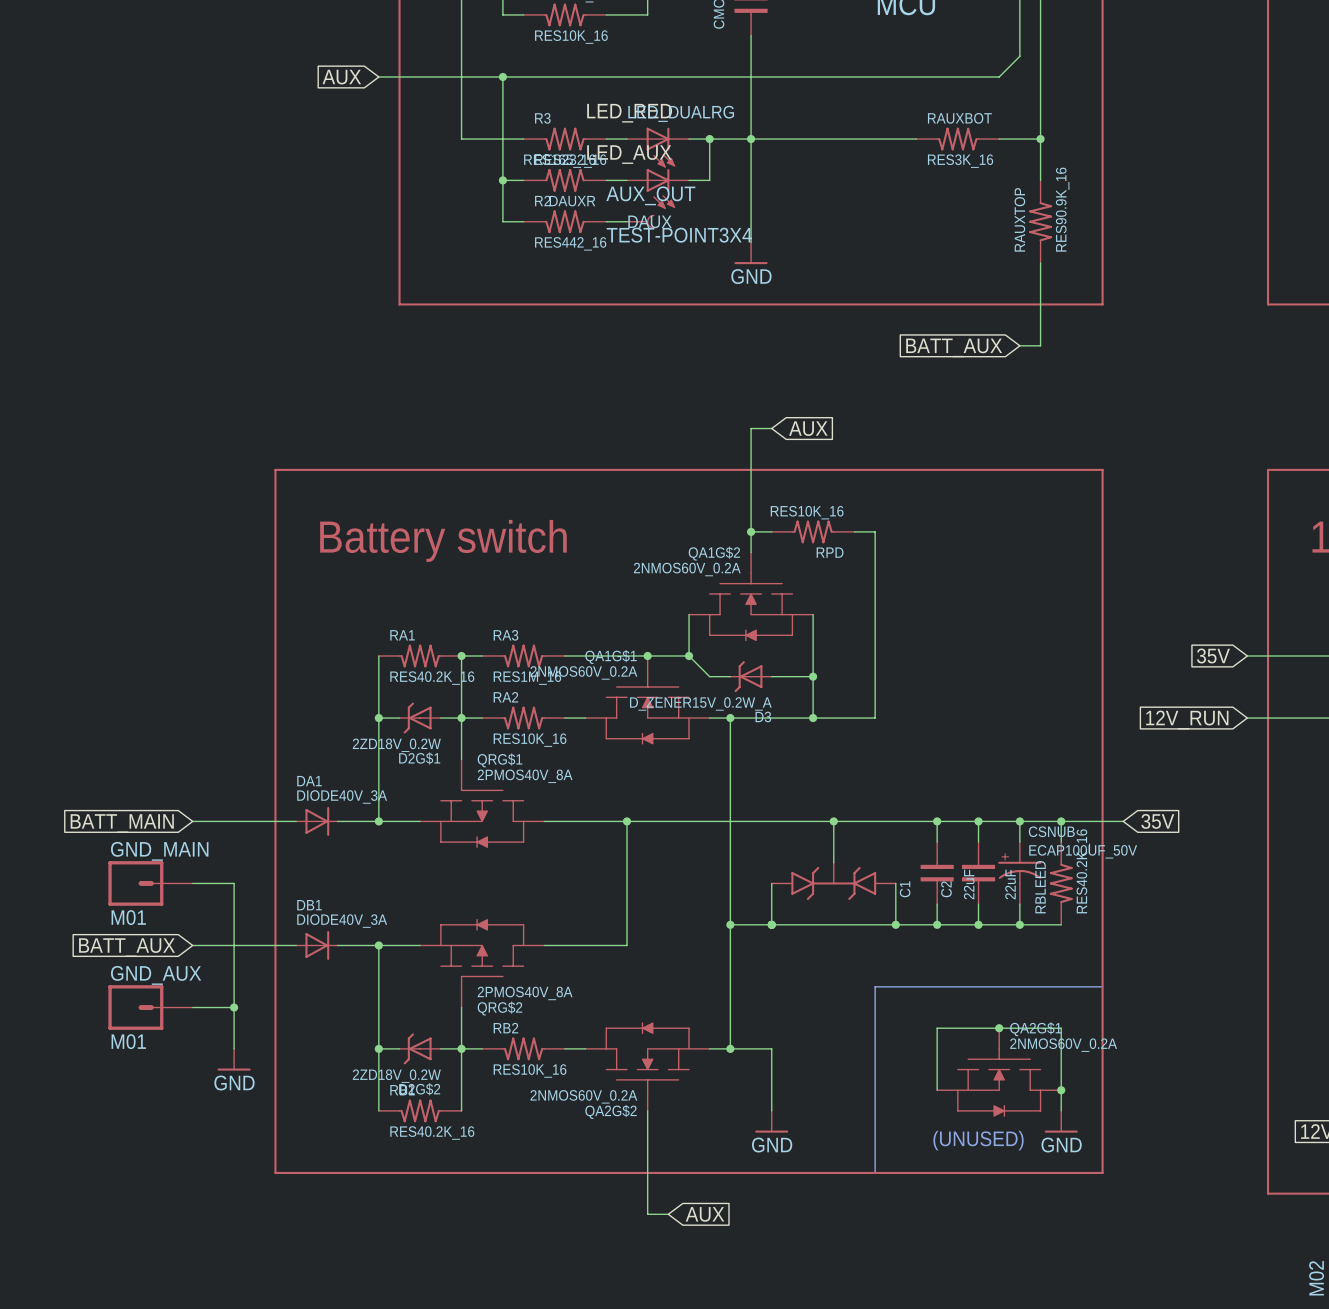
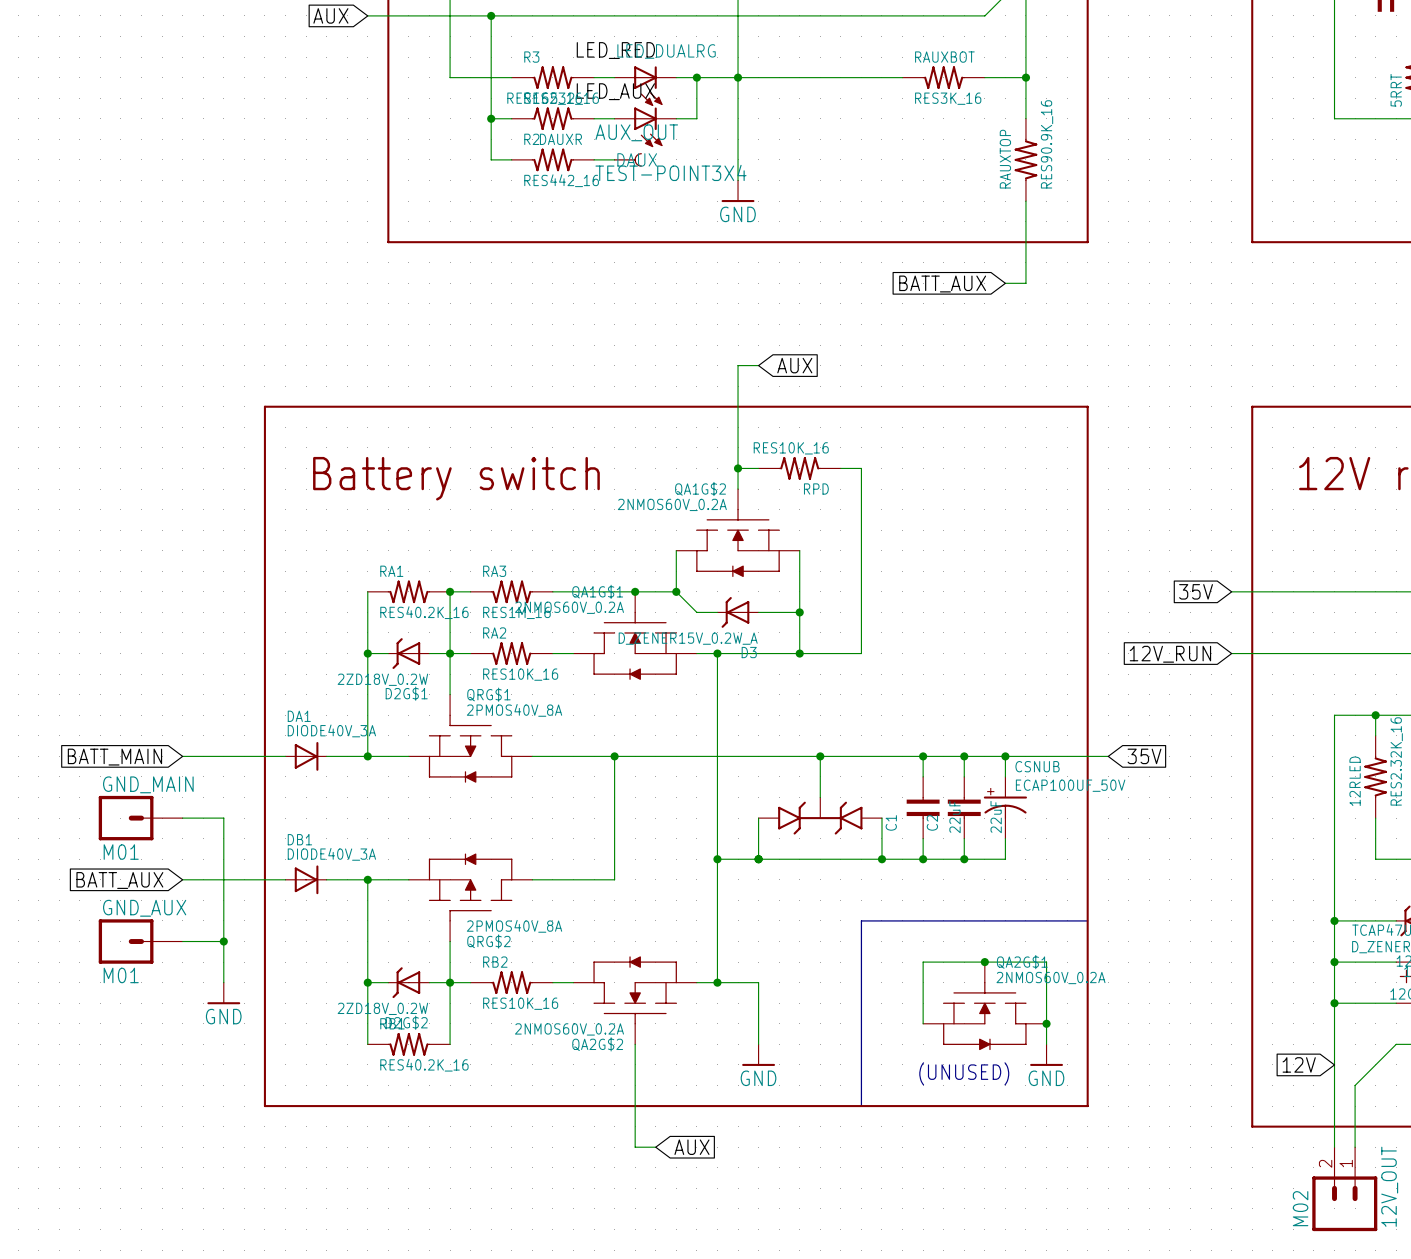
wire: (1061, 821) (1061, 842) -> none
junction: (1061, 821) -> none
RBLEED: RES40.2K_16 (1061, 883) -> none
wire: (1019, 924) (1061, 924) -> none
junction: (1019, 924) -> none

